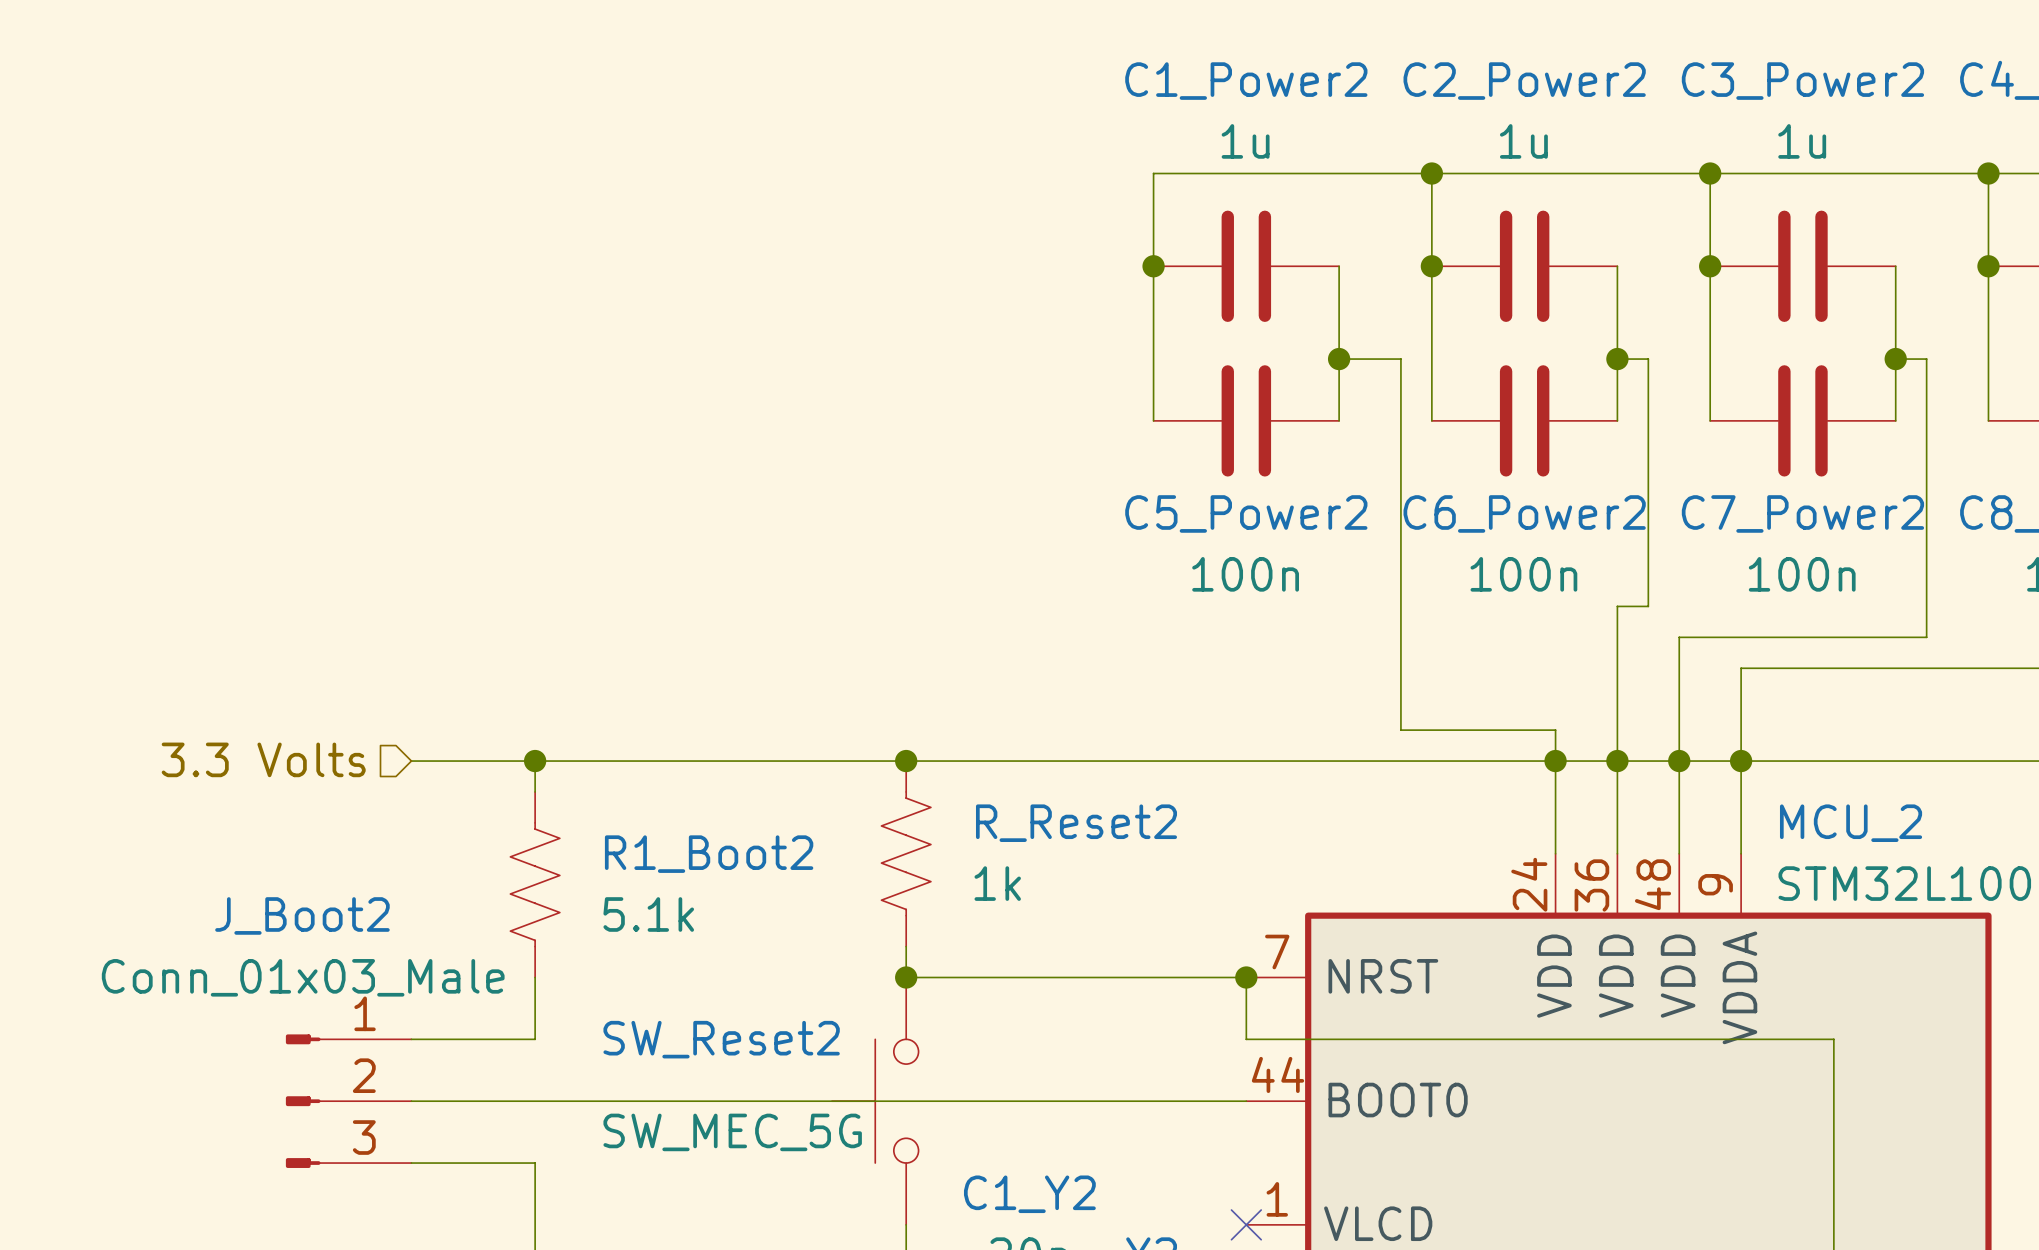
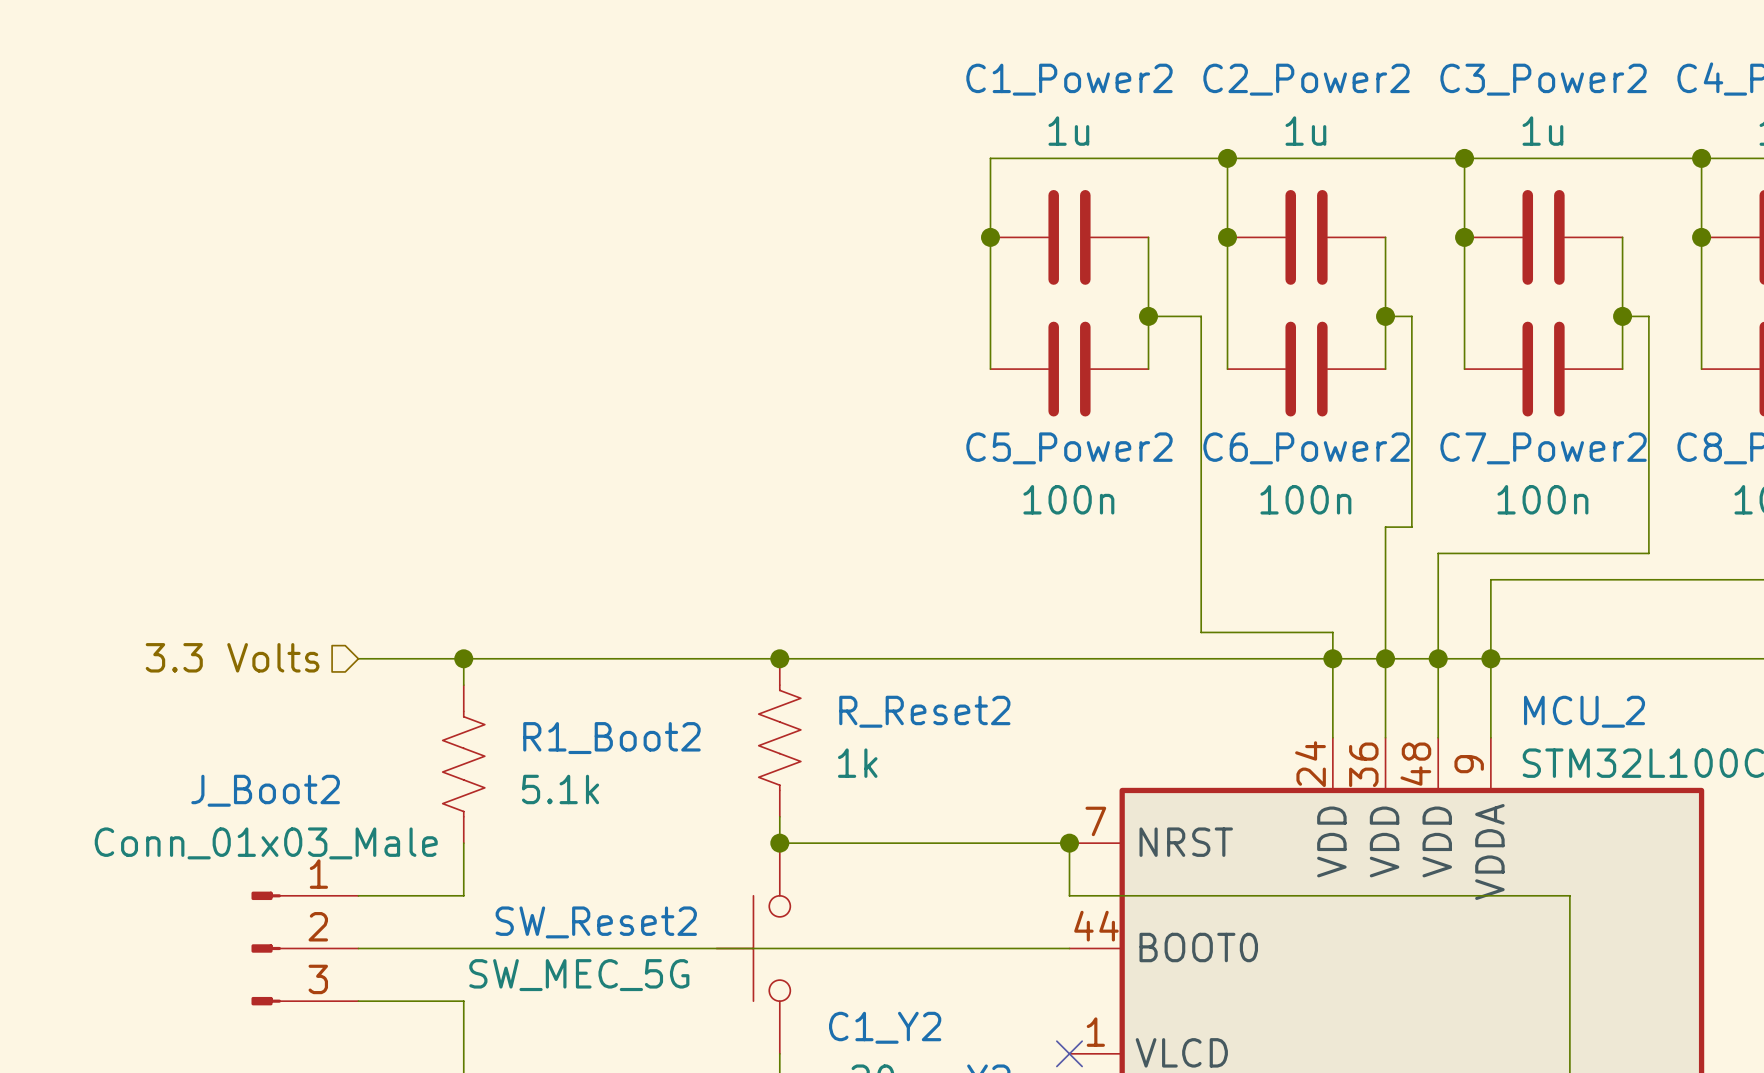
SW_Reset2 name position: SW_Reset2 (721, 1039) -> SW_Reset2 (596, 922)
SW_Reset2 value position: SW_MEC_5G (732, 1132) -> SW_MEC_5G (579, 975)

